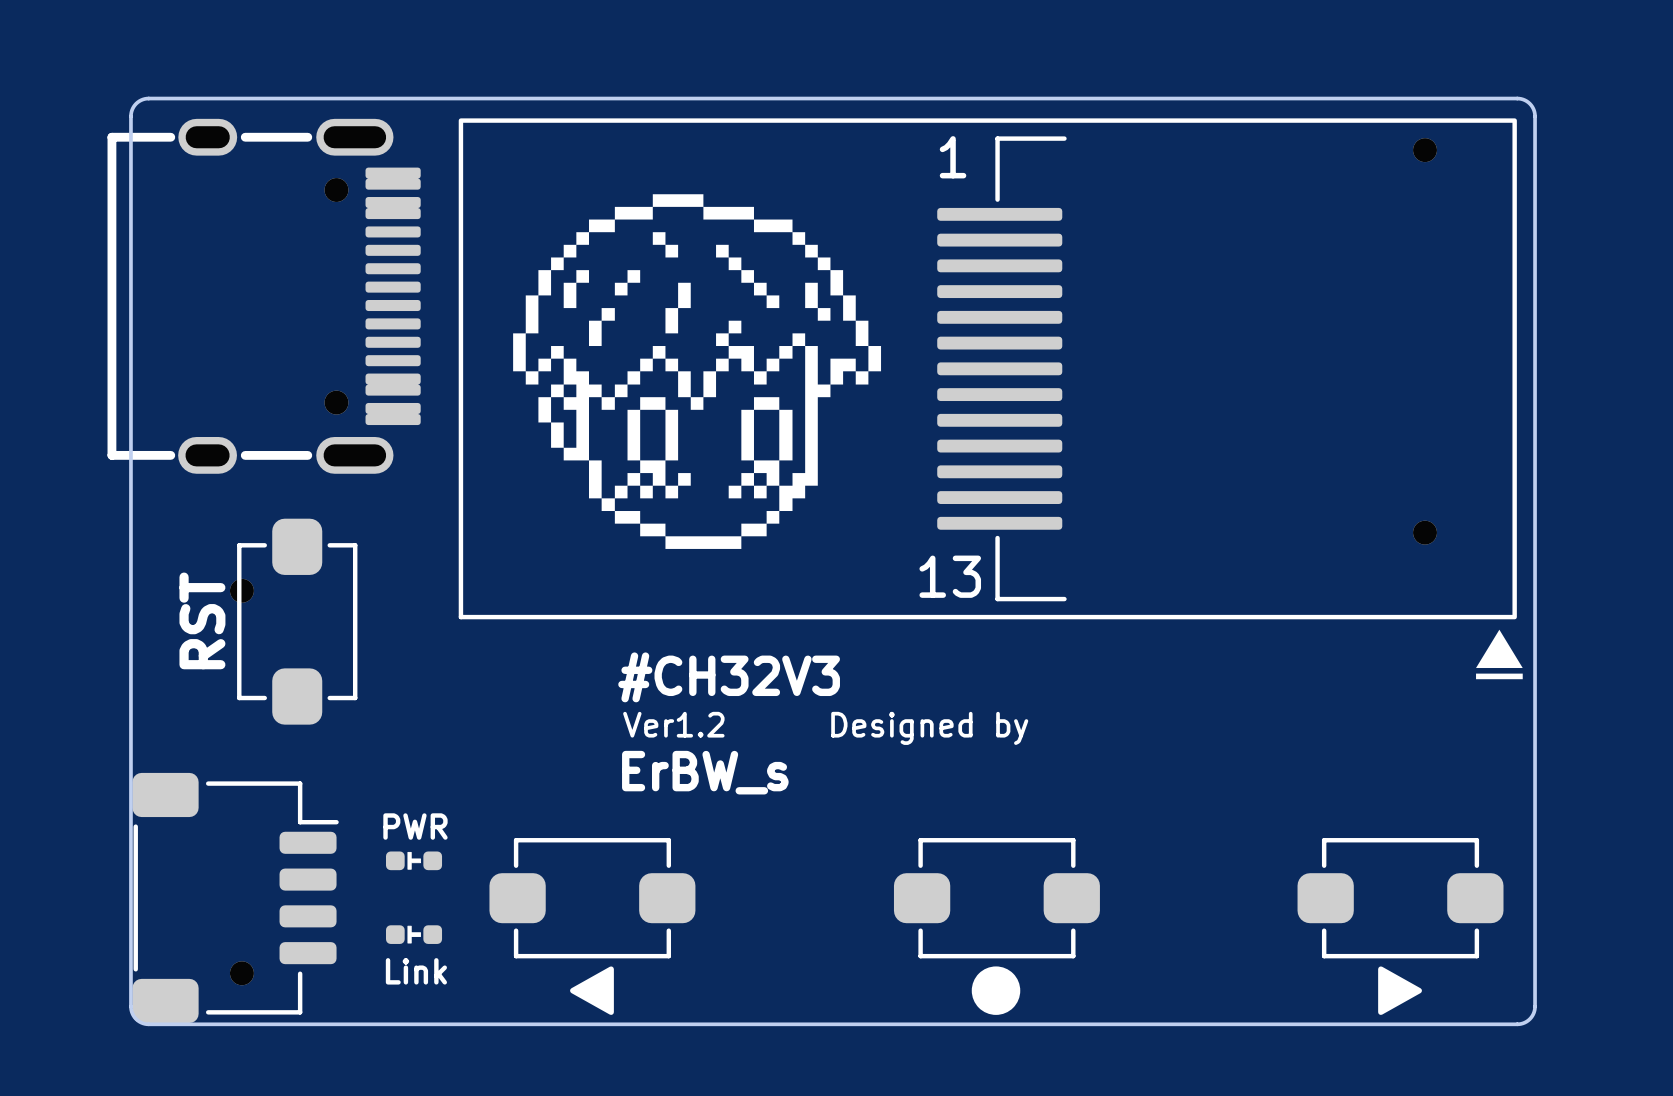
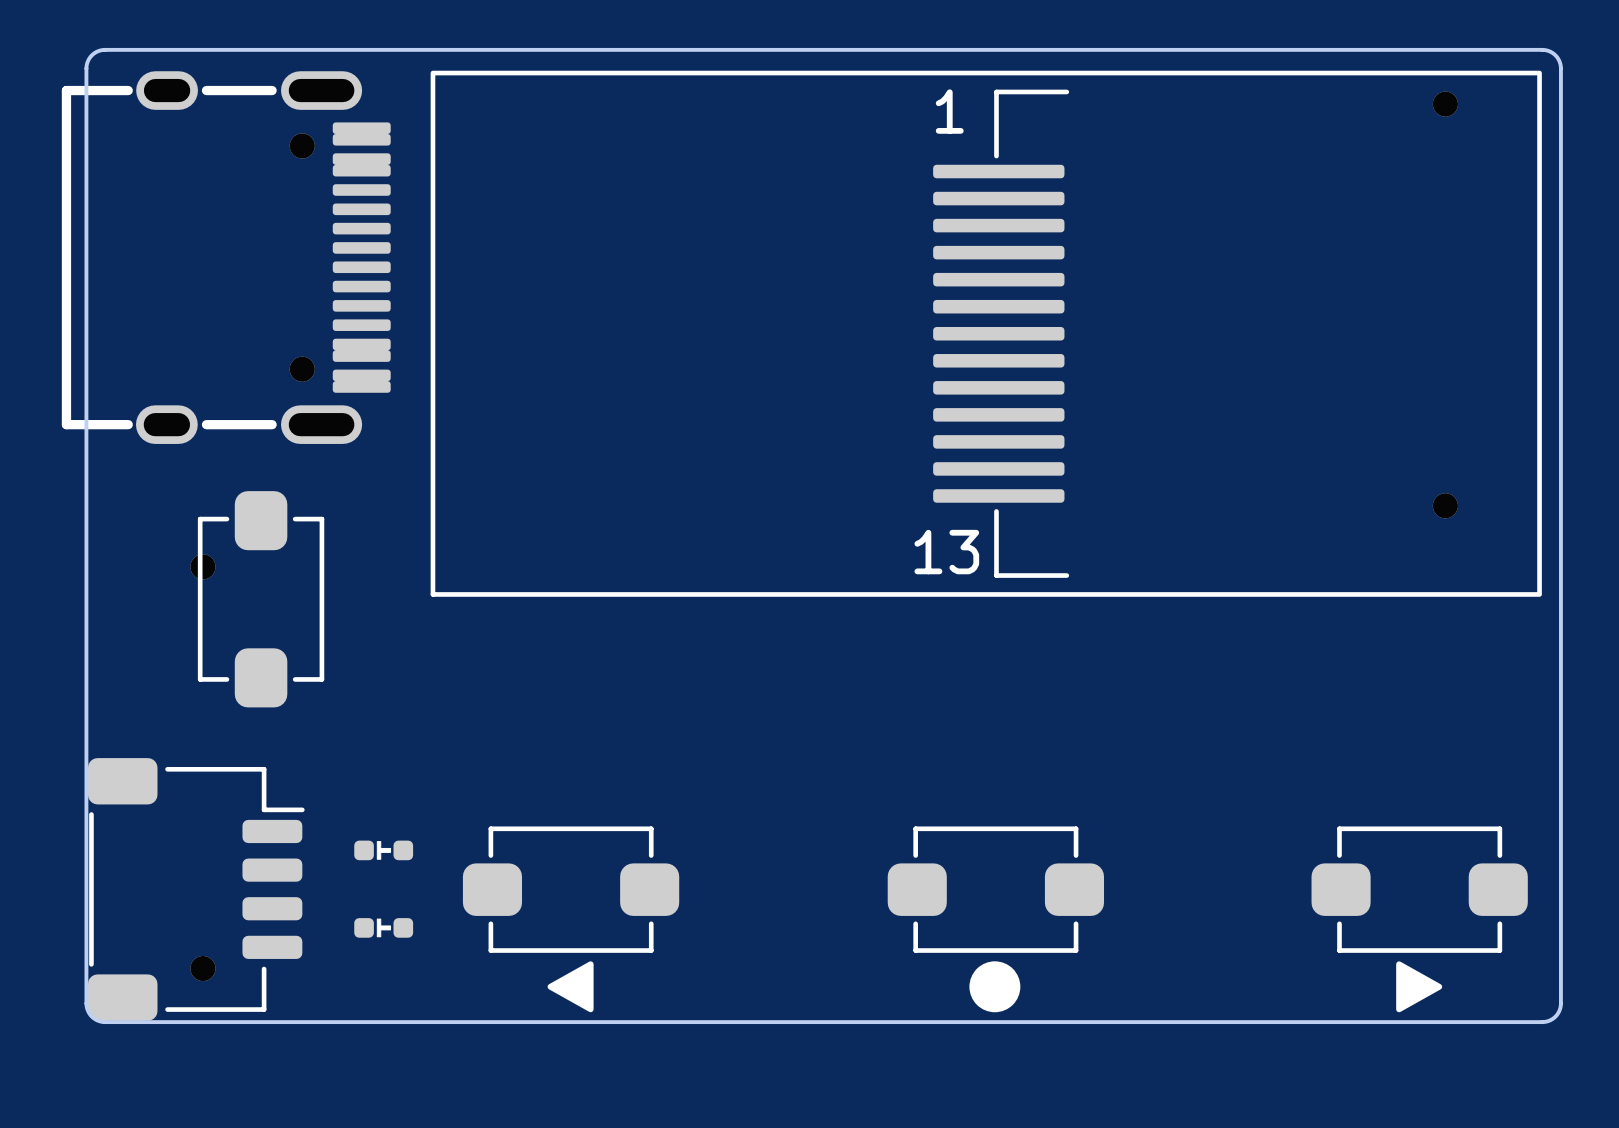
drawing: [513, 194, 882, 549] -> none
text: RST (202, 620) -> none
drawing: [1476, 629, 1523, 680] -> none
text: #CH32V3 (729, 677) -> none
text: Ver1.2 Designed by (825, 728) -> none
text: ErBW_s (705, 772) -> none
text: PWR (415, 826) -> none
text: Link (416, 971) -> none

